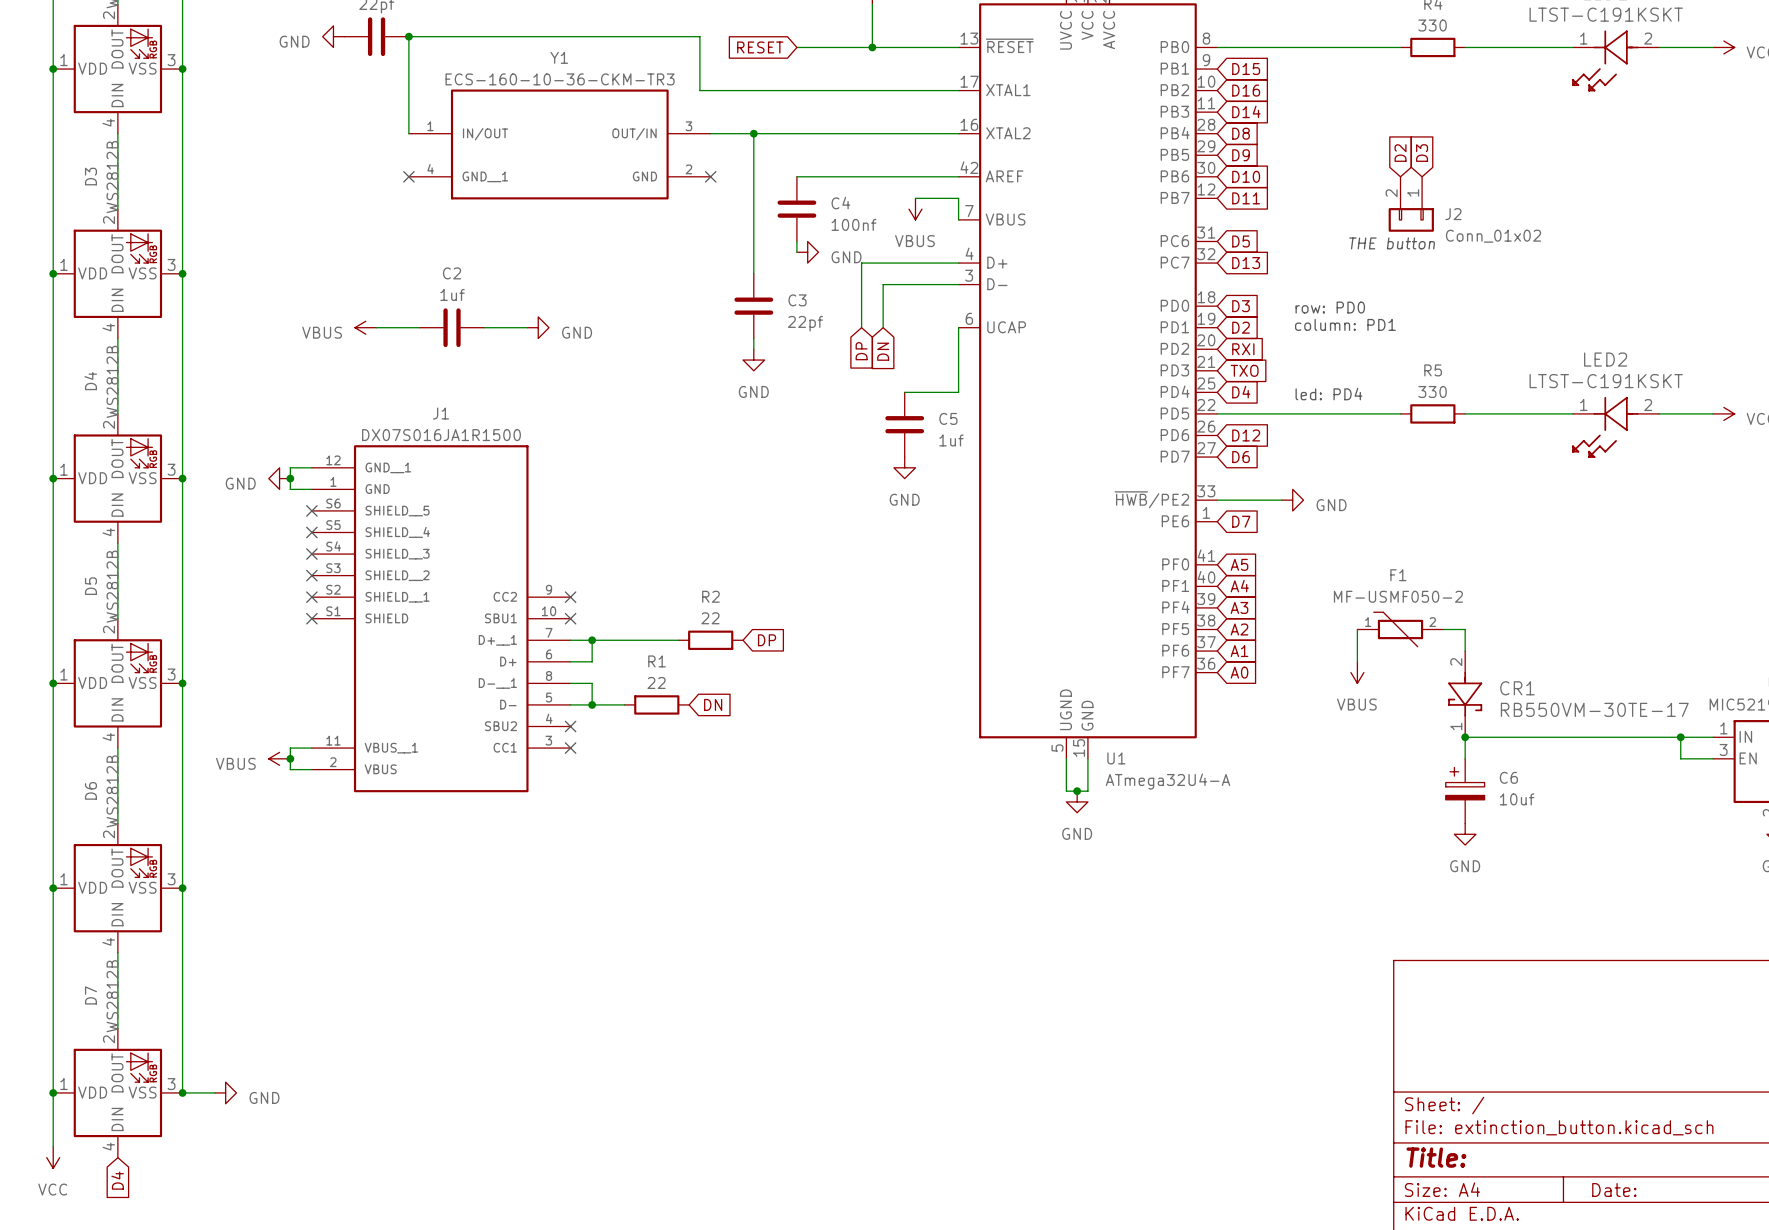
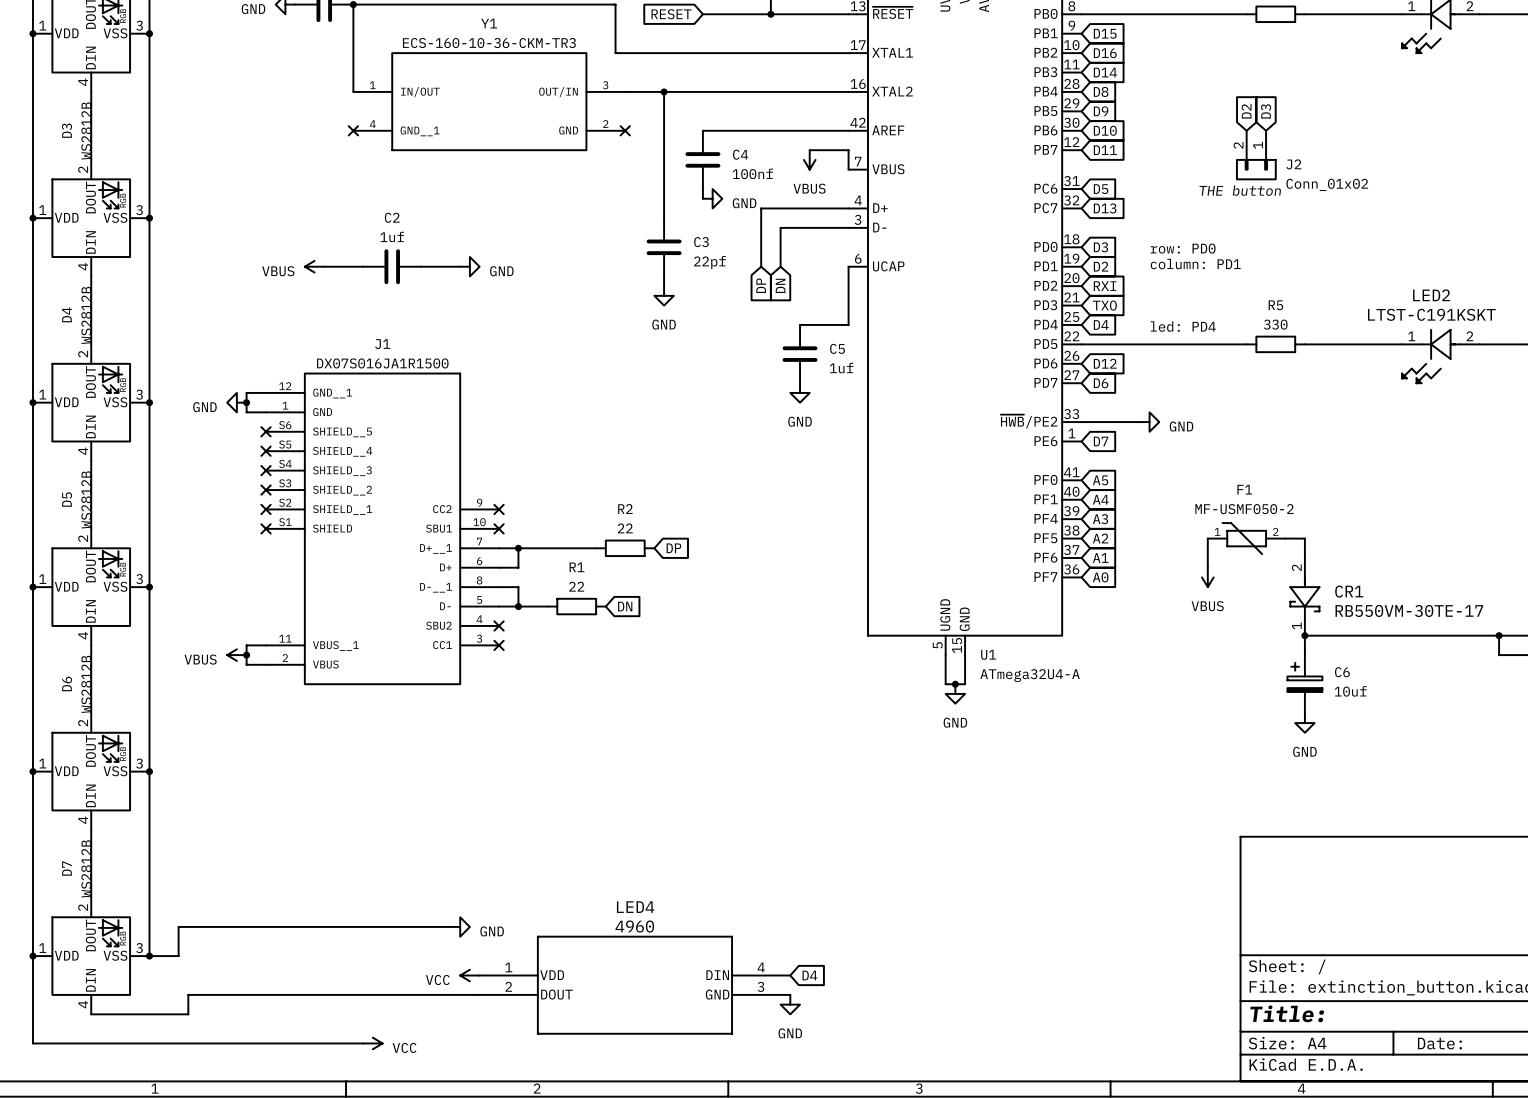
wire: none -> (450, 926) (178, 926) (178, 956)
power symbol: none -> GND (460, 926)
power symbol: GND (225, 1092) -> none
power symbol: none -> VCC (469, 975)
global label: none -> D4 (809, 975)
LED4: none -> 4960 (634, 985)
wire: none -> (479, 994) (188, 994) (188, 1014) (91, 1014)
wire: none -> (32, 1004) (32, 1043) (363, 1043)
power symbol: none -> GND (790, 1004)
power symbol: VCC (53, 1157) -> none
global label: D4 (117, 1180) -> none
power symbol: none -> VCC (372, 1043)

